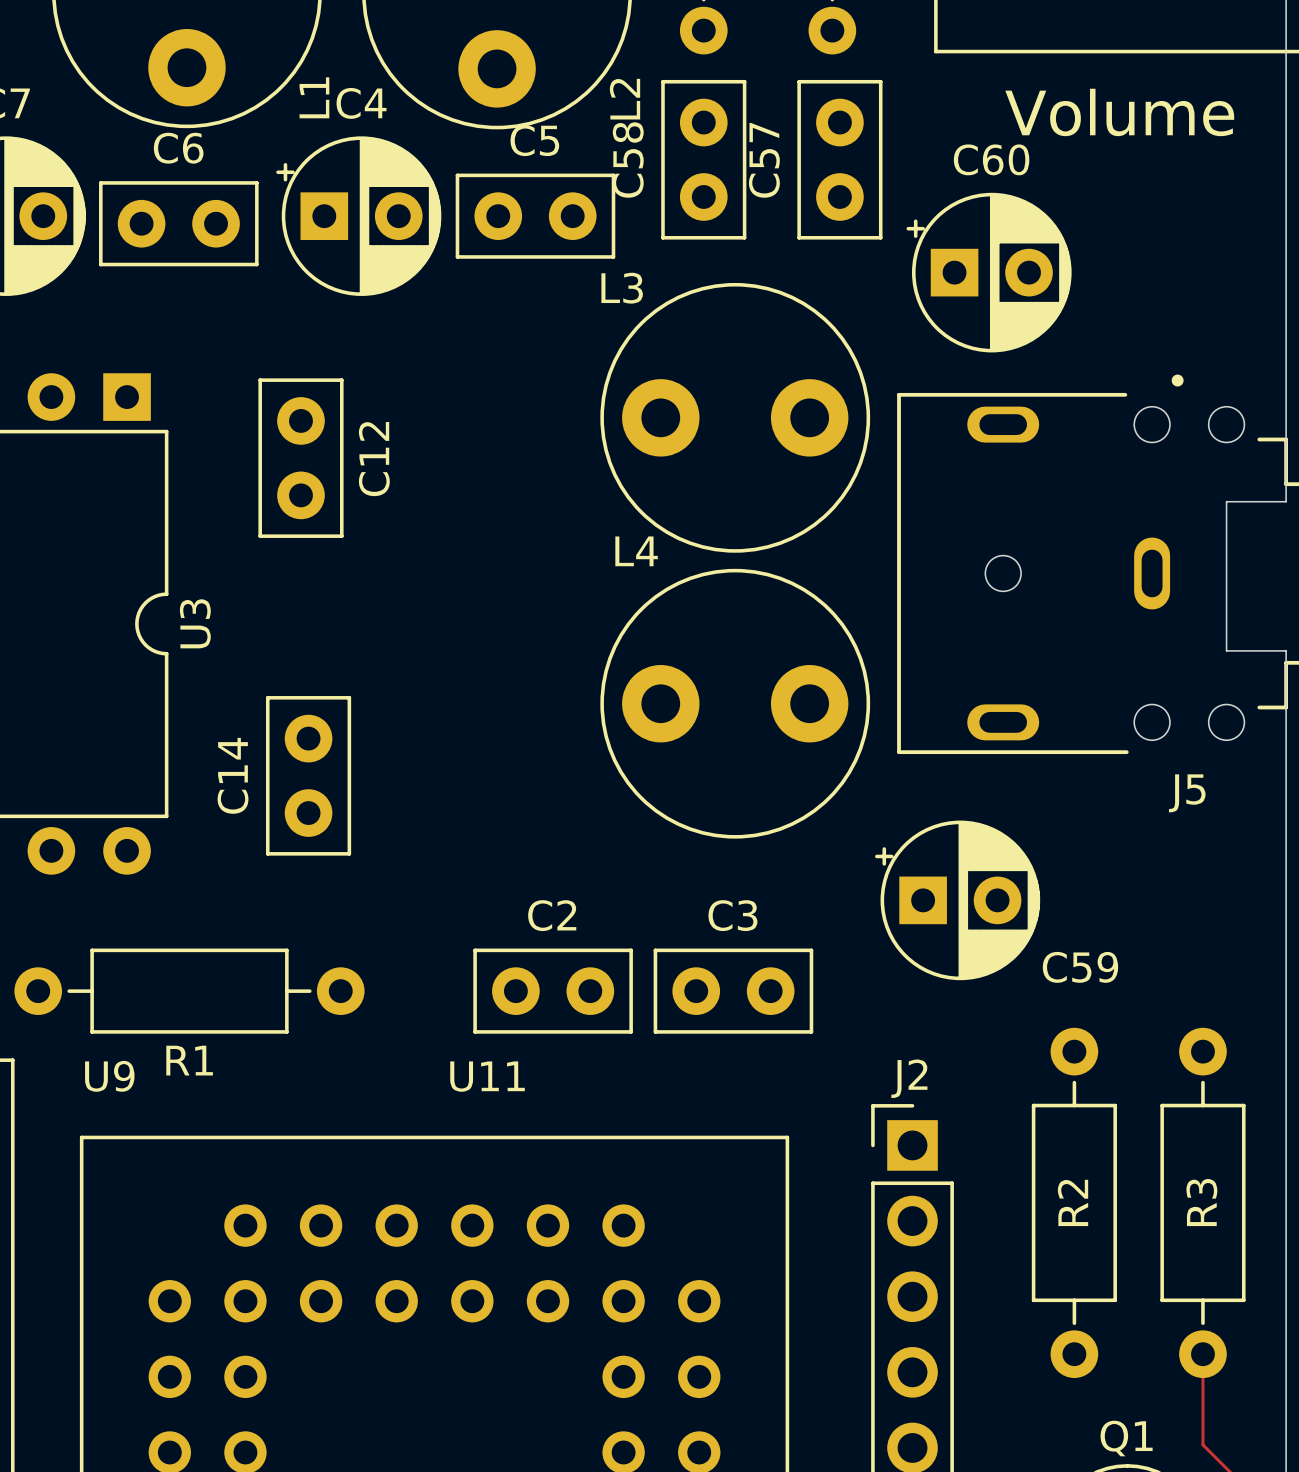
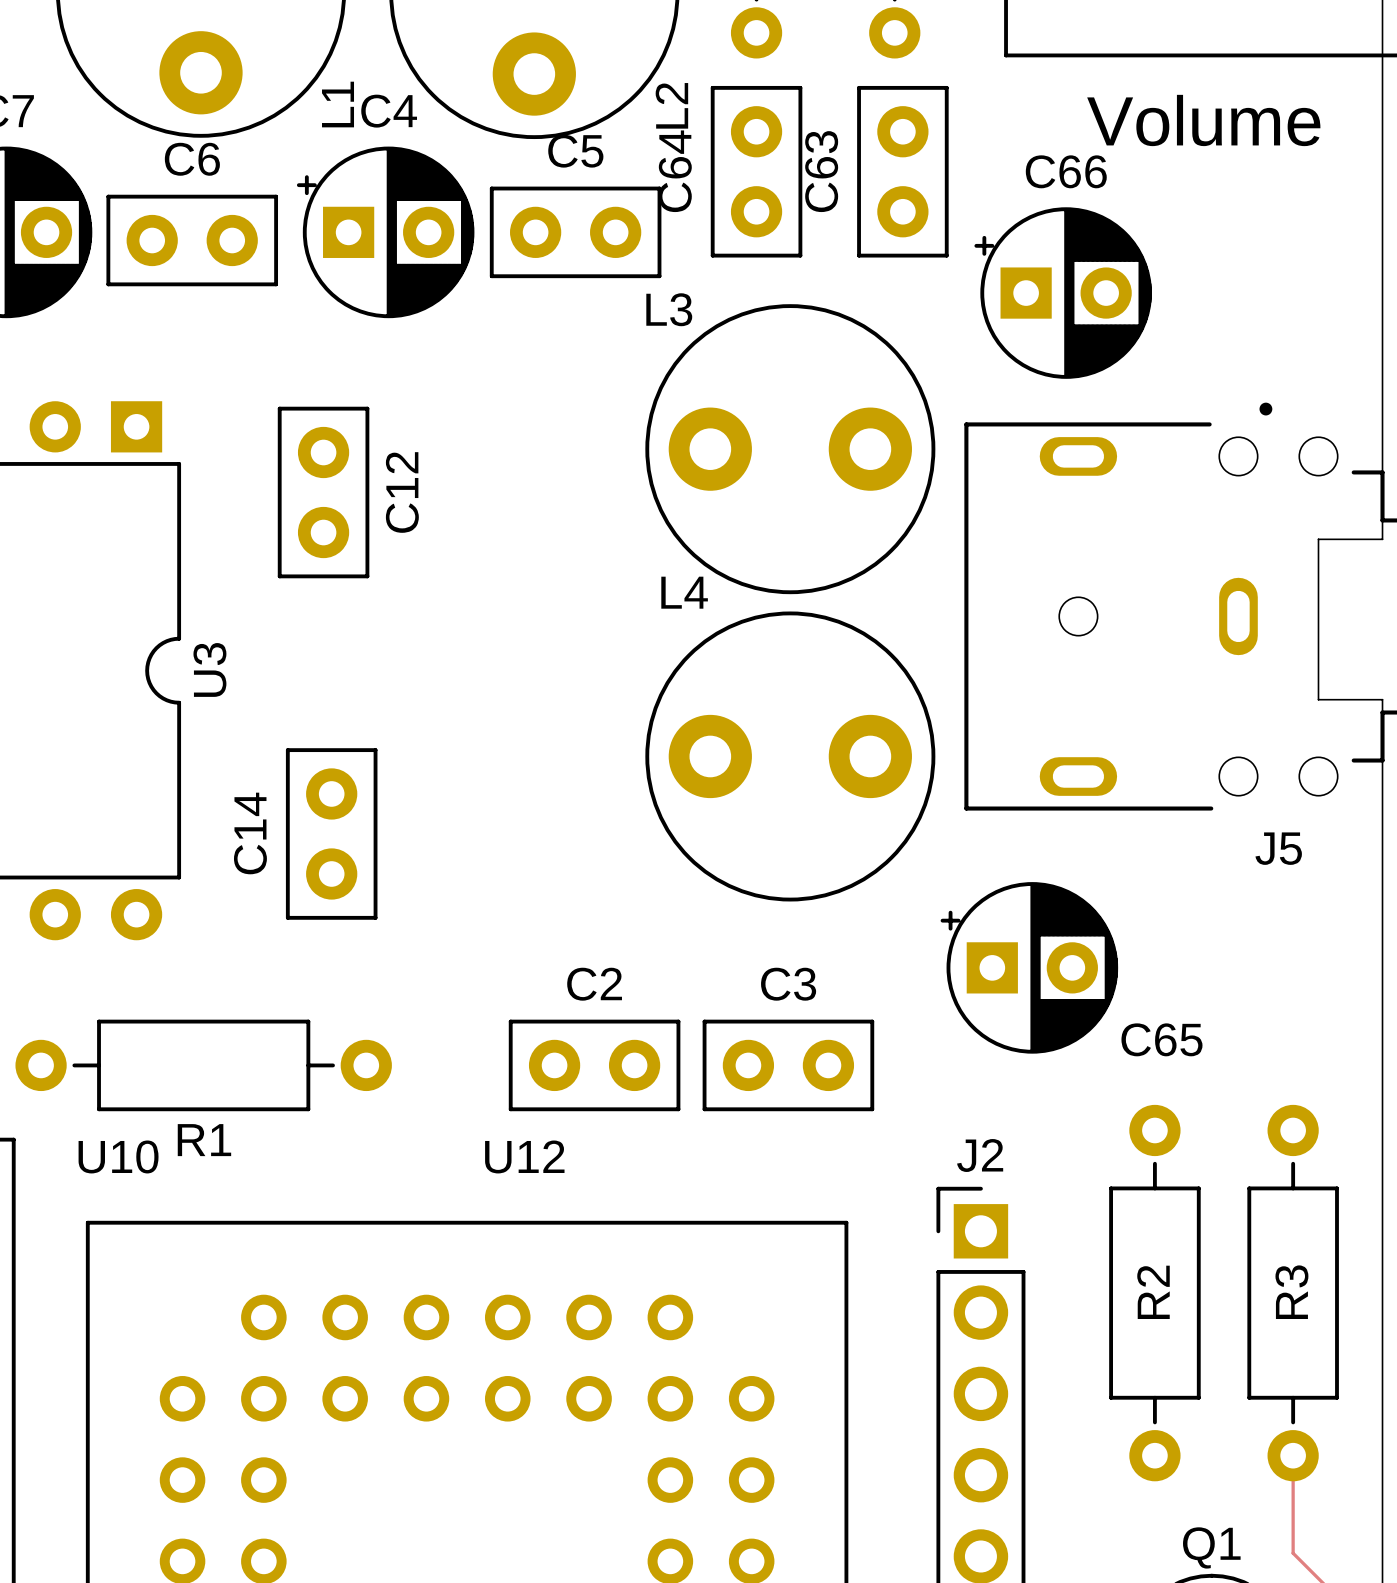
C60 name: C60 (991, 159) -> C66 (1066, 171)
C58 name: C58 (628, 160) -> C64 (675, 171)
C57 name: C57 (764, 160) -> C63 (821, 171)
C59 name: C59 (1080, 967) -> C65 (1161, 1039)
U9 name: U9 (109, 1076) -> U10 (118, 1156)
U11 name: U11 (487, 1076) -> U12 (524, 1156)

